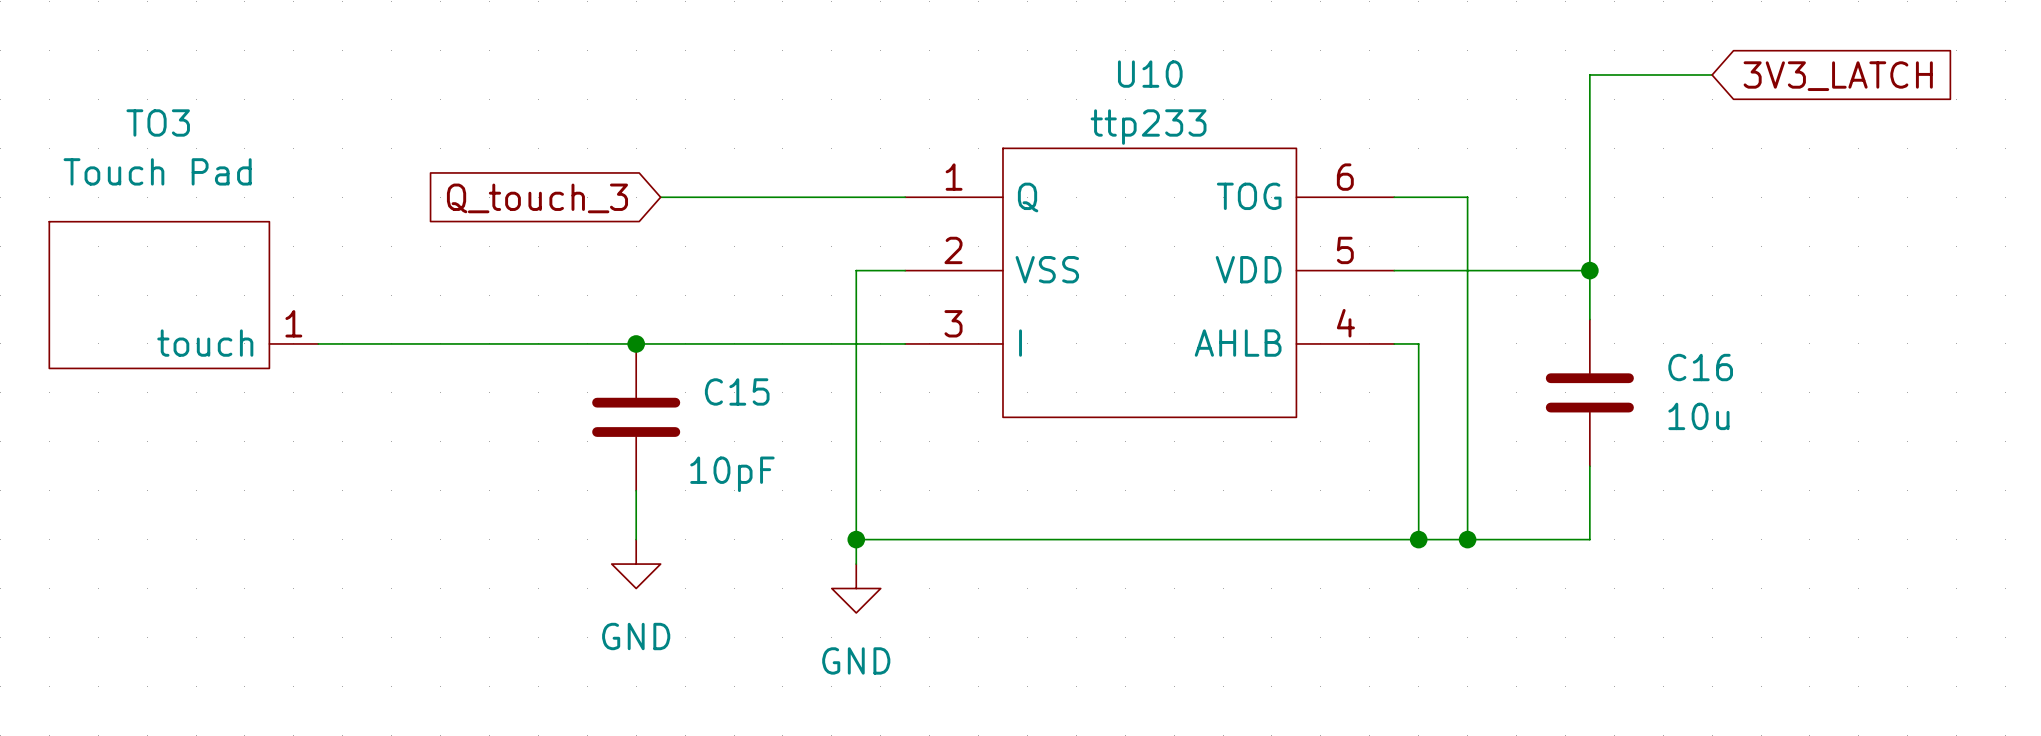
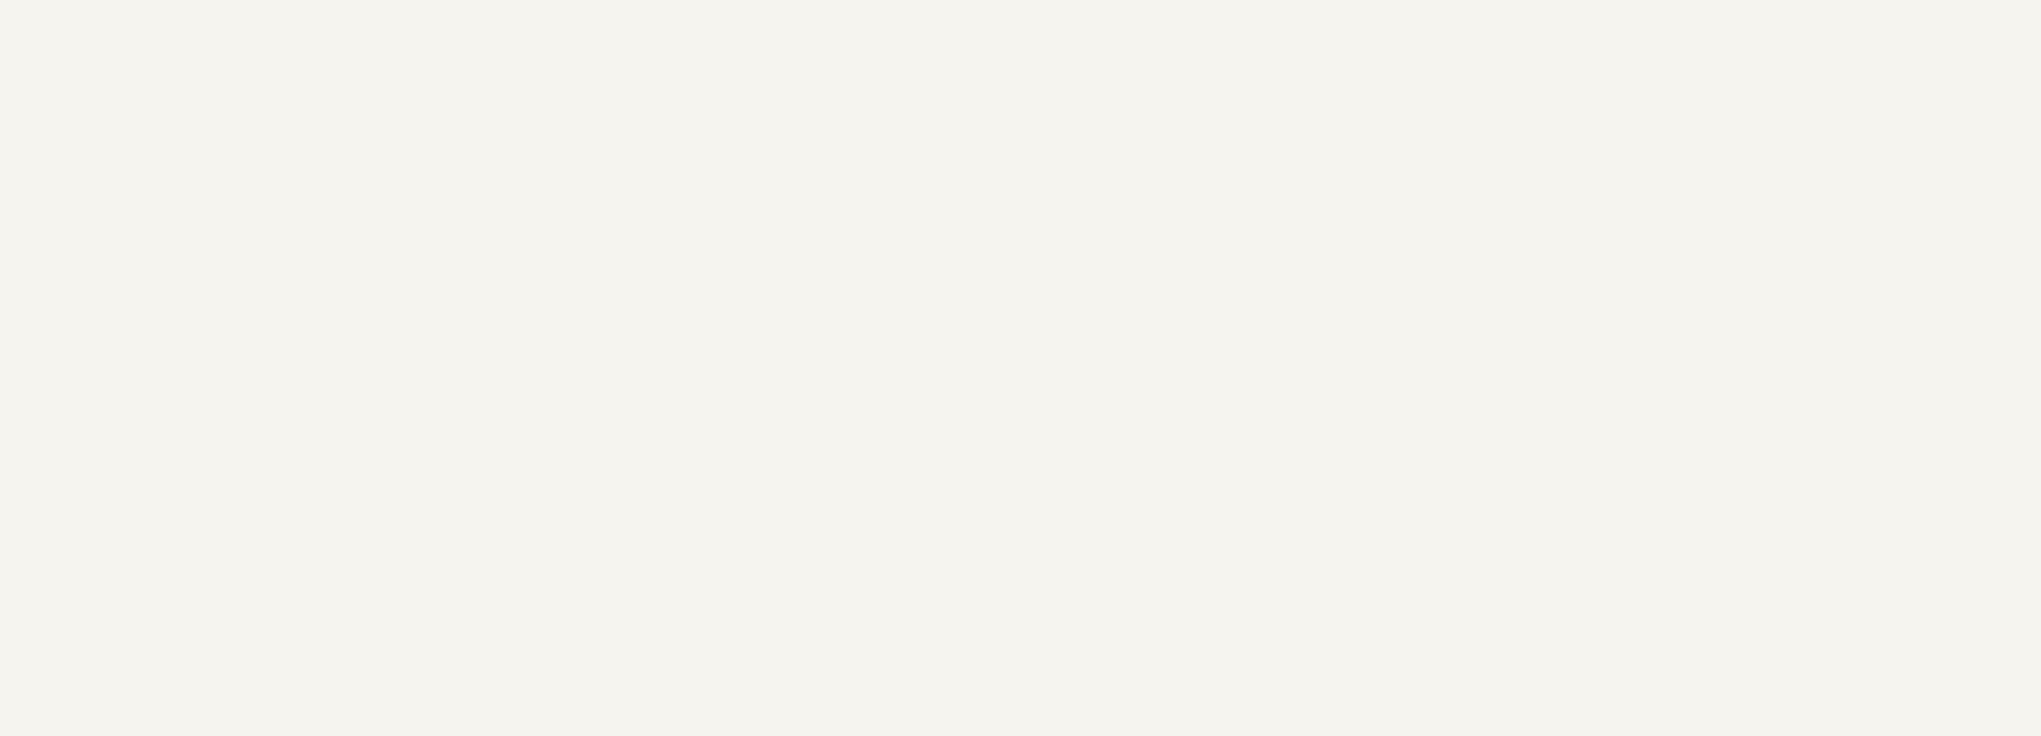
wire: (1712, 74) (1589, 74) (1589, 319) -> none
global label: 3V3_LATCH (1838, 76) -> none
wire: (660, 197) (905, 197) -> none
wire: (1394, 197) (1467, 197) (1467, 539) -> none
global label: Q_touch_3 (537, 198) -> none
wire: (905, 270) (856, 270) (856, 564) -> none
wire: (1394, 270) (1589, 270) -> none
junction: (1589, 270) -> none
U10: ttp233 (1149, 282) -> none
TO3: Touch Pad (183, 295) -> none
wire: (318, 343) (905, 343) -> none
junction: (636, 343) -> none
wire: (1394, 343) (1418, 343) (1418, 539) -> none
C16: 10u (1589, 392) -> none
C15: 10pF (636, 417) -> none
wire: (1589, 466) (1589, 539) (856, 539) -> none
wire: (636, 490) (636, 539) -> none
junction: (856, 539) -> none
junction: (1418, 539) -> none
junction: (1467, 539) -> none
power symbol: GND (636, 564) -> none
power symbol: GND (856, 588) -> none

